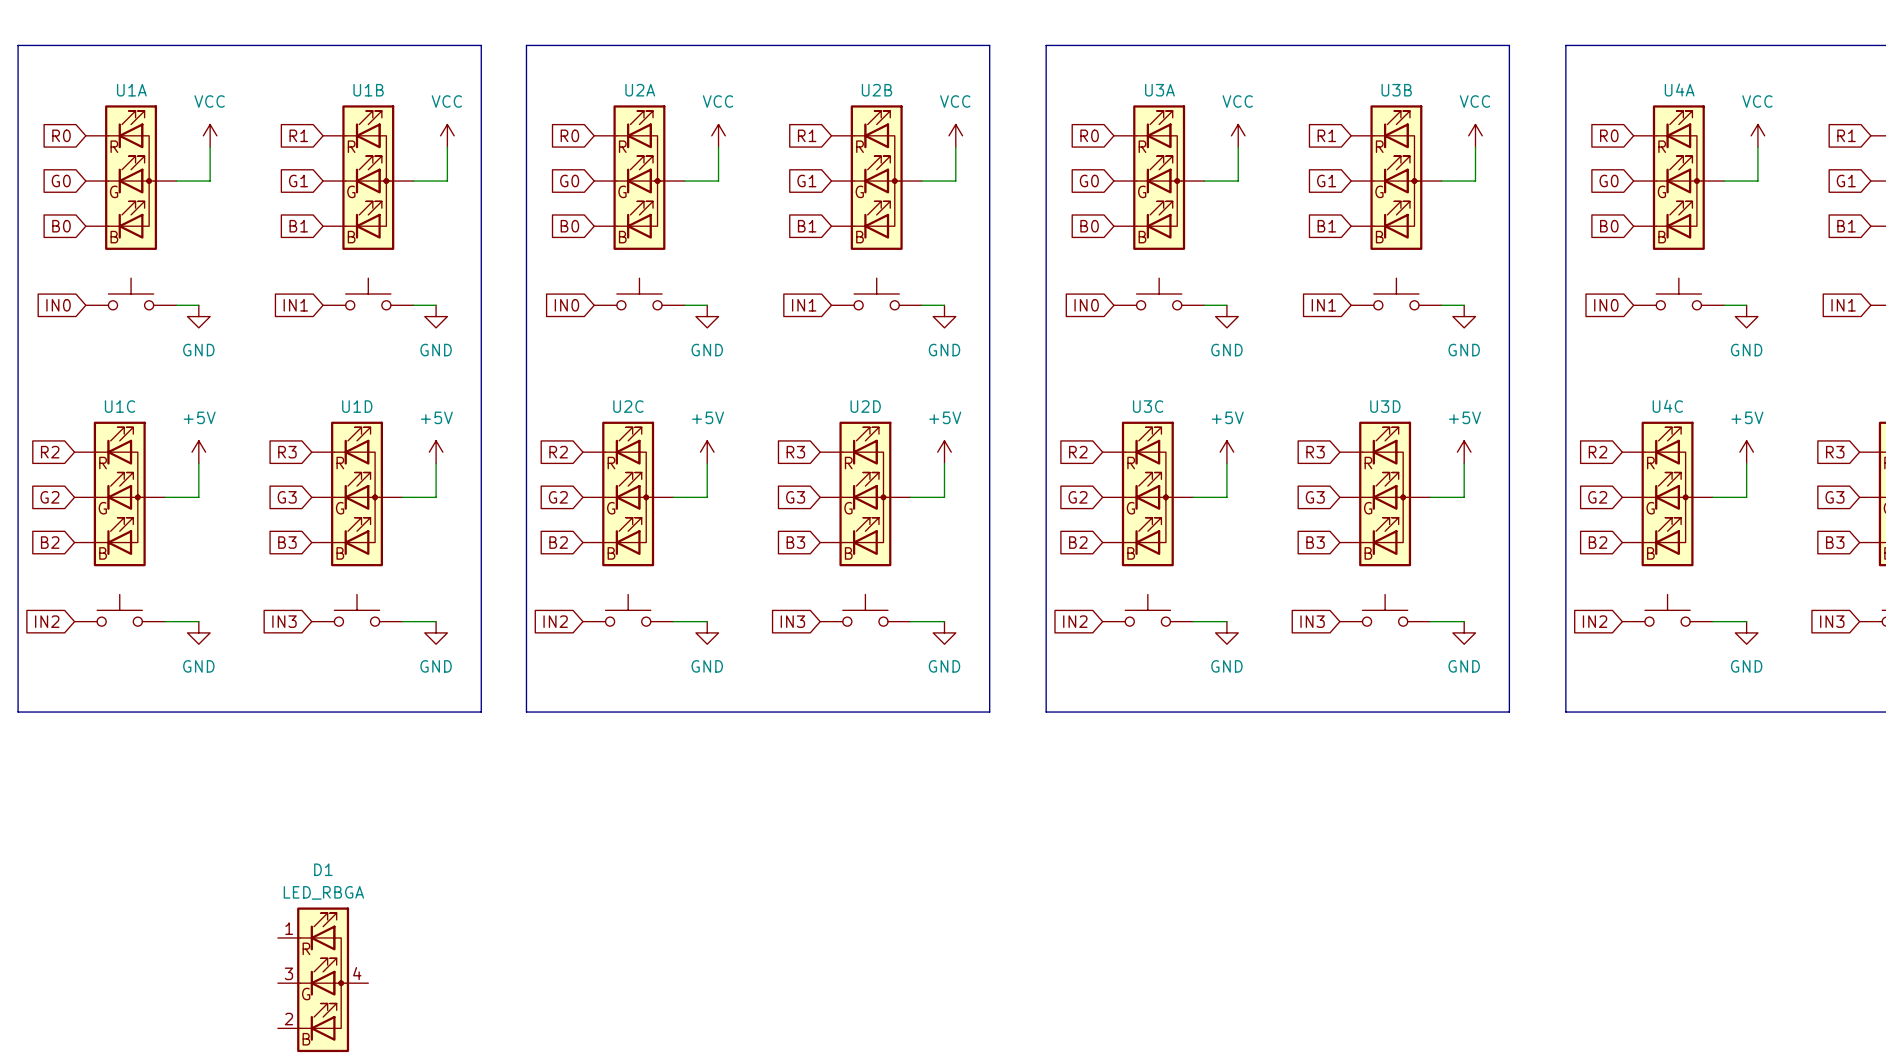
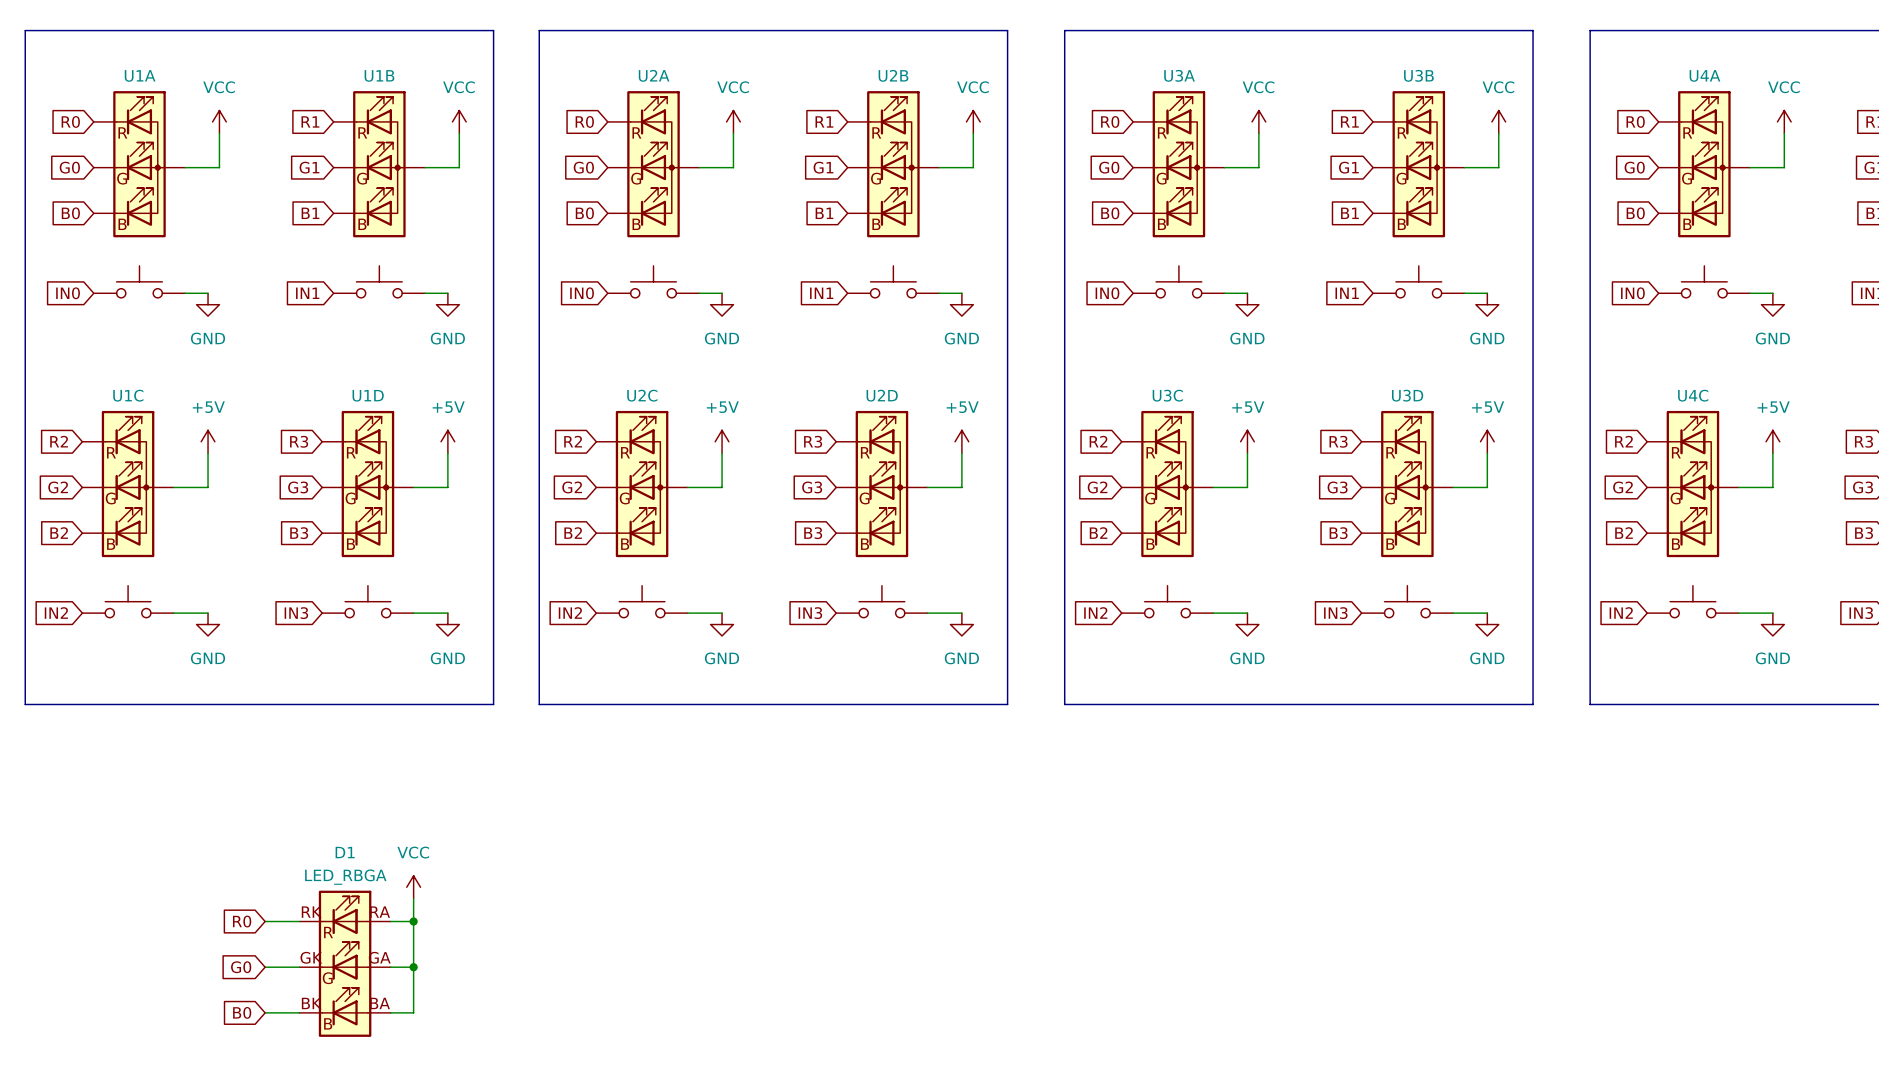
power symbol: none -> VCC (413, 887)
wire: none -> (413, 898) (413, 1012) (390, 1012)
D1 symbol: [277, 907, 369, 1053] -> [299, 890, 391, 1037]
global label: none -> R0 (242, 921)
wire: none -> (265, 921) (299, 921)
wire: none -> (390, 921) (413, 921)
junction: none -> (413, 921)
global label: none -> G0 (241, 967)
wire: none -> (265, 967) (299, 967)
wire: none -> (390, 967) (413, 967)
junction: none -> (413, 967)
global label: none -> B0 (242, 1012)
wire: none -> (265, 1012) (299, 1012)

